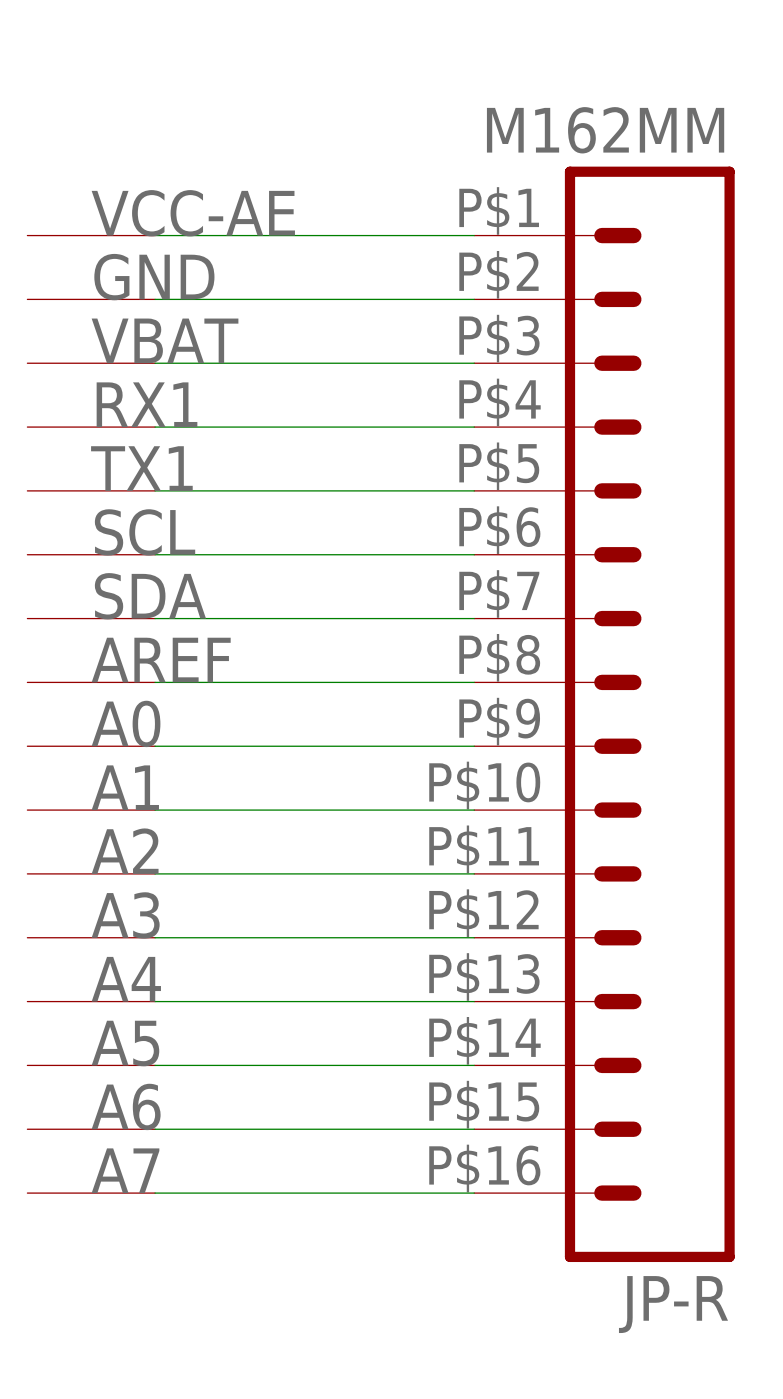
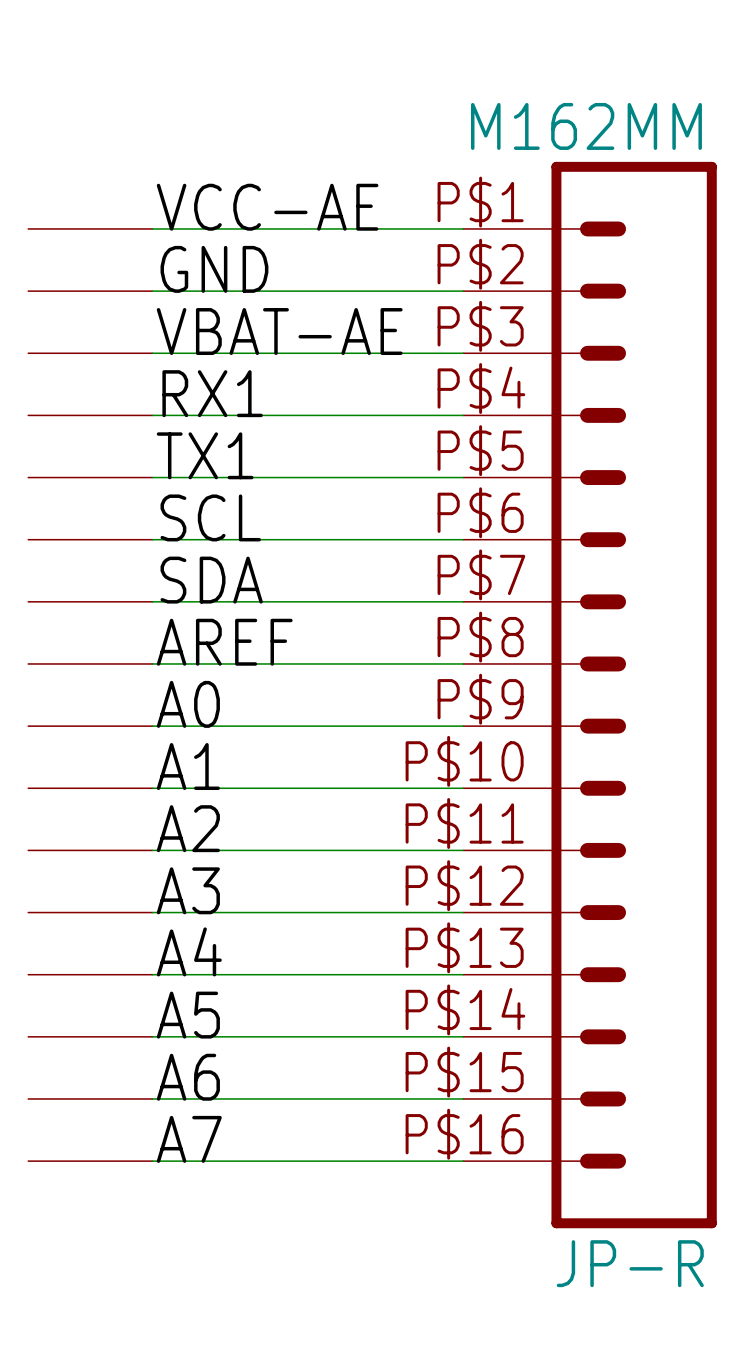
label position: VCC-AE (193, 213) -> VCC-AE (267, 207)
label position: GND (154, 277) -> GND (214, 269)
label: VBAT (165, 340) -> VBAT-AE (279, 331)
label position: RX1 (147, 404) -> RX1 (212, 393)
label position: TX1 (141, 468) -> TX1 (205, 455)
label position: SCL (145, 532) -> SCL (210, 517)
label position: SDA (150, 596) -> SDA (211, 580)
label position: AREF (161, 660) -> AREF (224, 642)
label position: A0 (126, 723) -> A0 (188, 704)
label position: A1 (125, 787) -> A1 (188, 766)
label position: A2 (125, 851) -> A2 (188, 828)
label position: A3 (125, 915) -> A3 (188, 890)
label position: A4 (126, 979) -> A4 (189, 951)
label position: A5 (125, 1043) -> A5 (188, 1015)
label position: A6 (126, 1106) -> A6 (188, 1077)
label position: A7 (125, 1170) -> A7 (189, 1139)

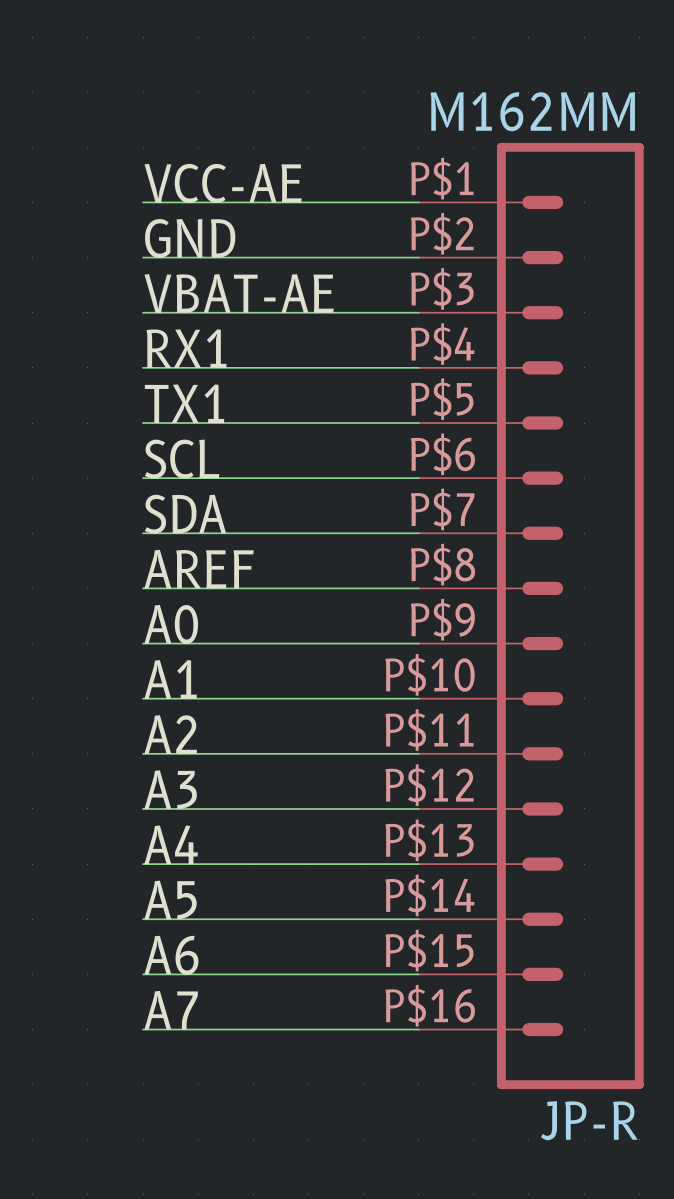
part: (90, 228) -> none
part: (90, 291) -> none
part: (90, 353) -> none
part: (90, 415) -> none
part: (90, 477) -> none
part: (90, 539) -> none
part: (90, 601) -> none
part: (90, 663) -> none
part: (90, 726) -> none
part: (90, 788) -> none
part: (90, 850) -> none
part: (90, 912) -> none
part: (90, 974) -> none
part: (90, 1036) -> none
part: (90, 1098) -> none
part: (90, 1161) -> none

